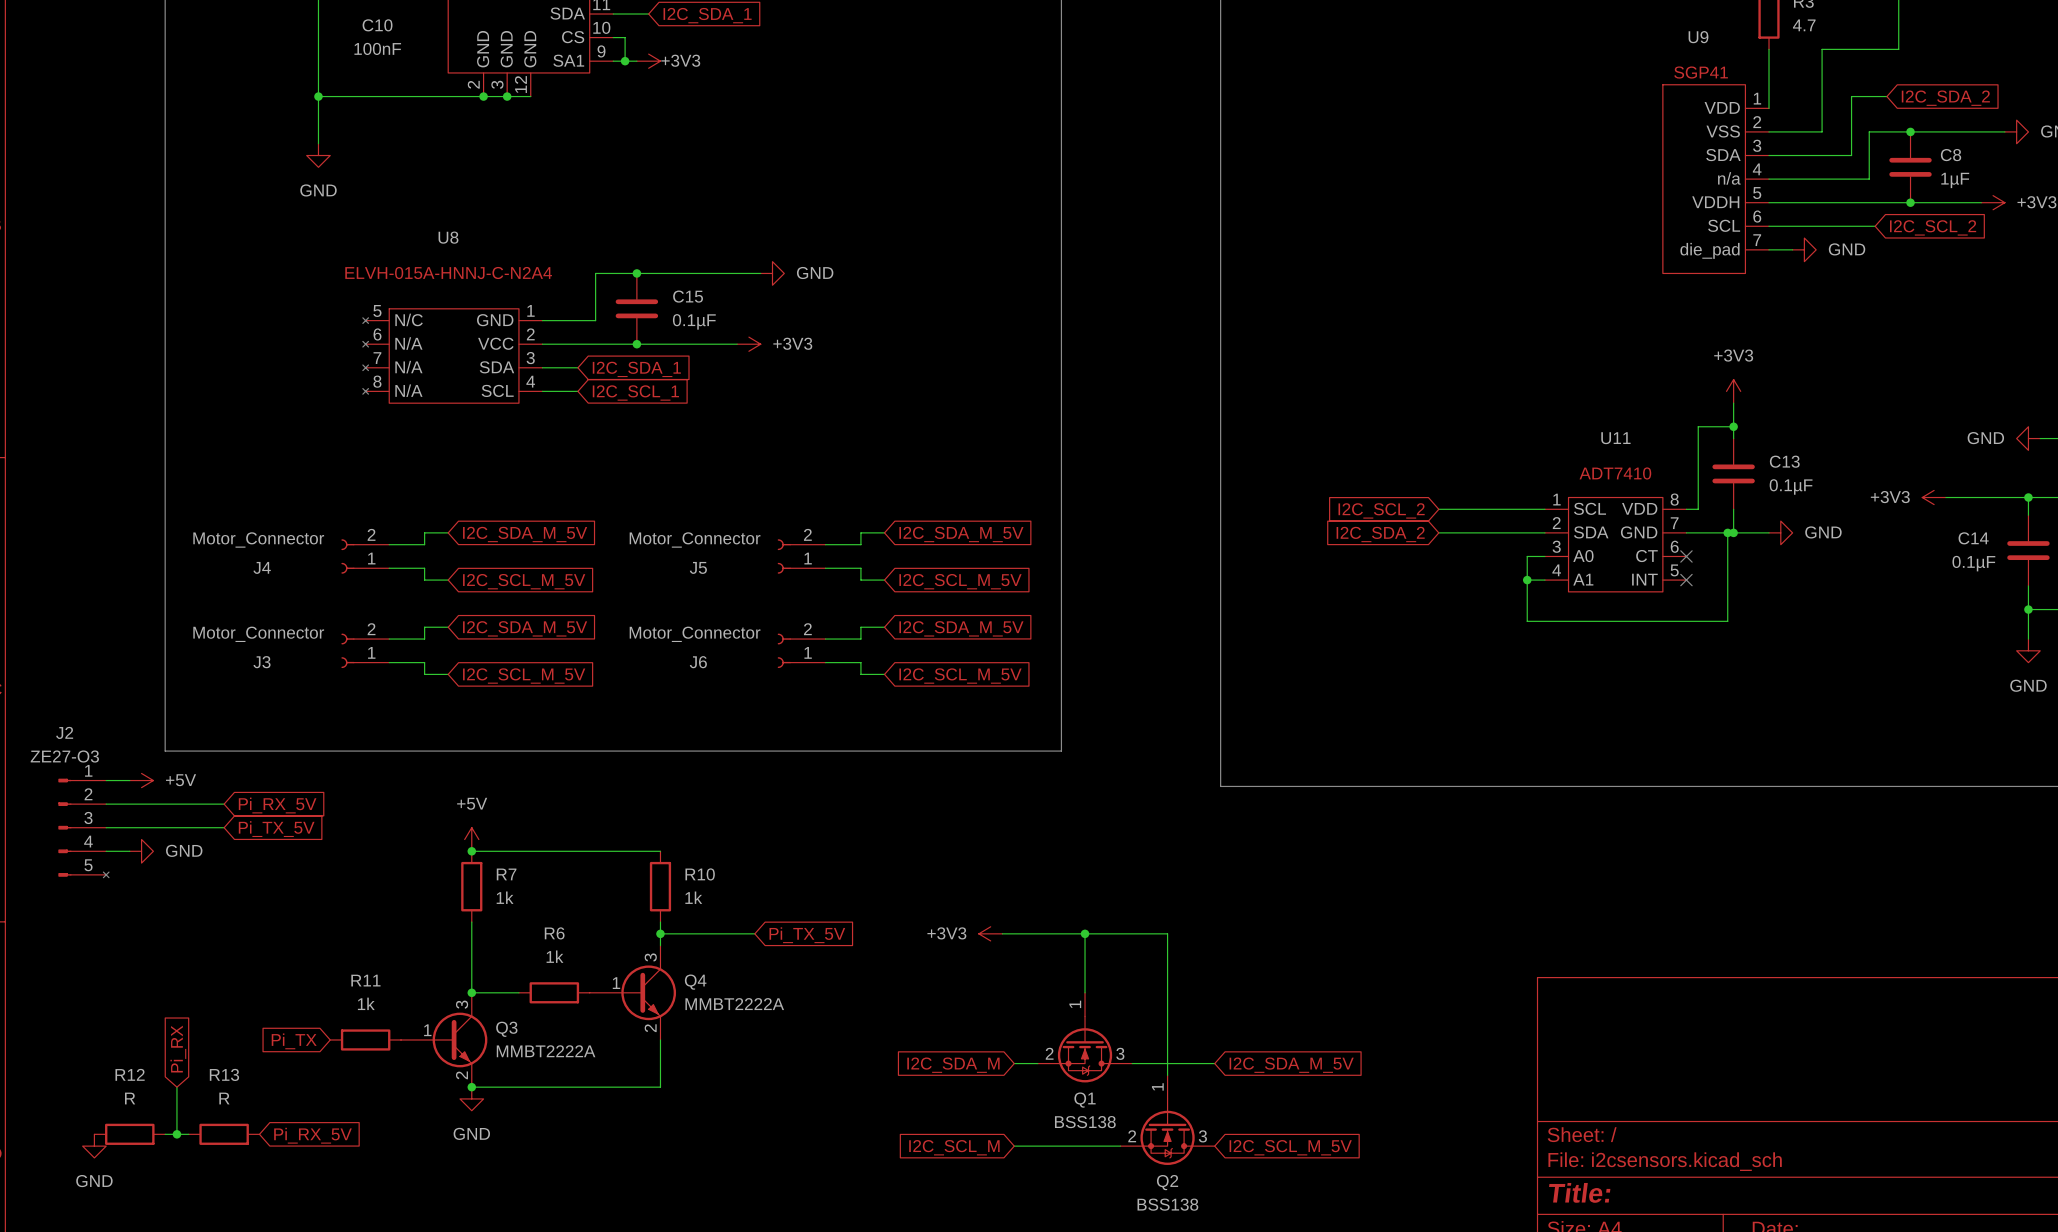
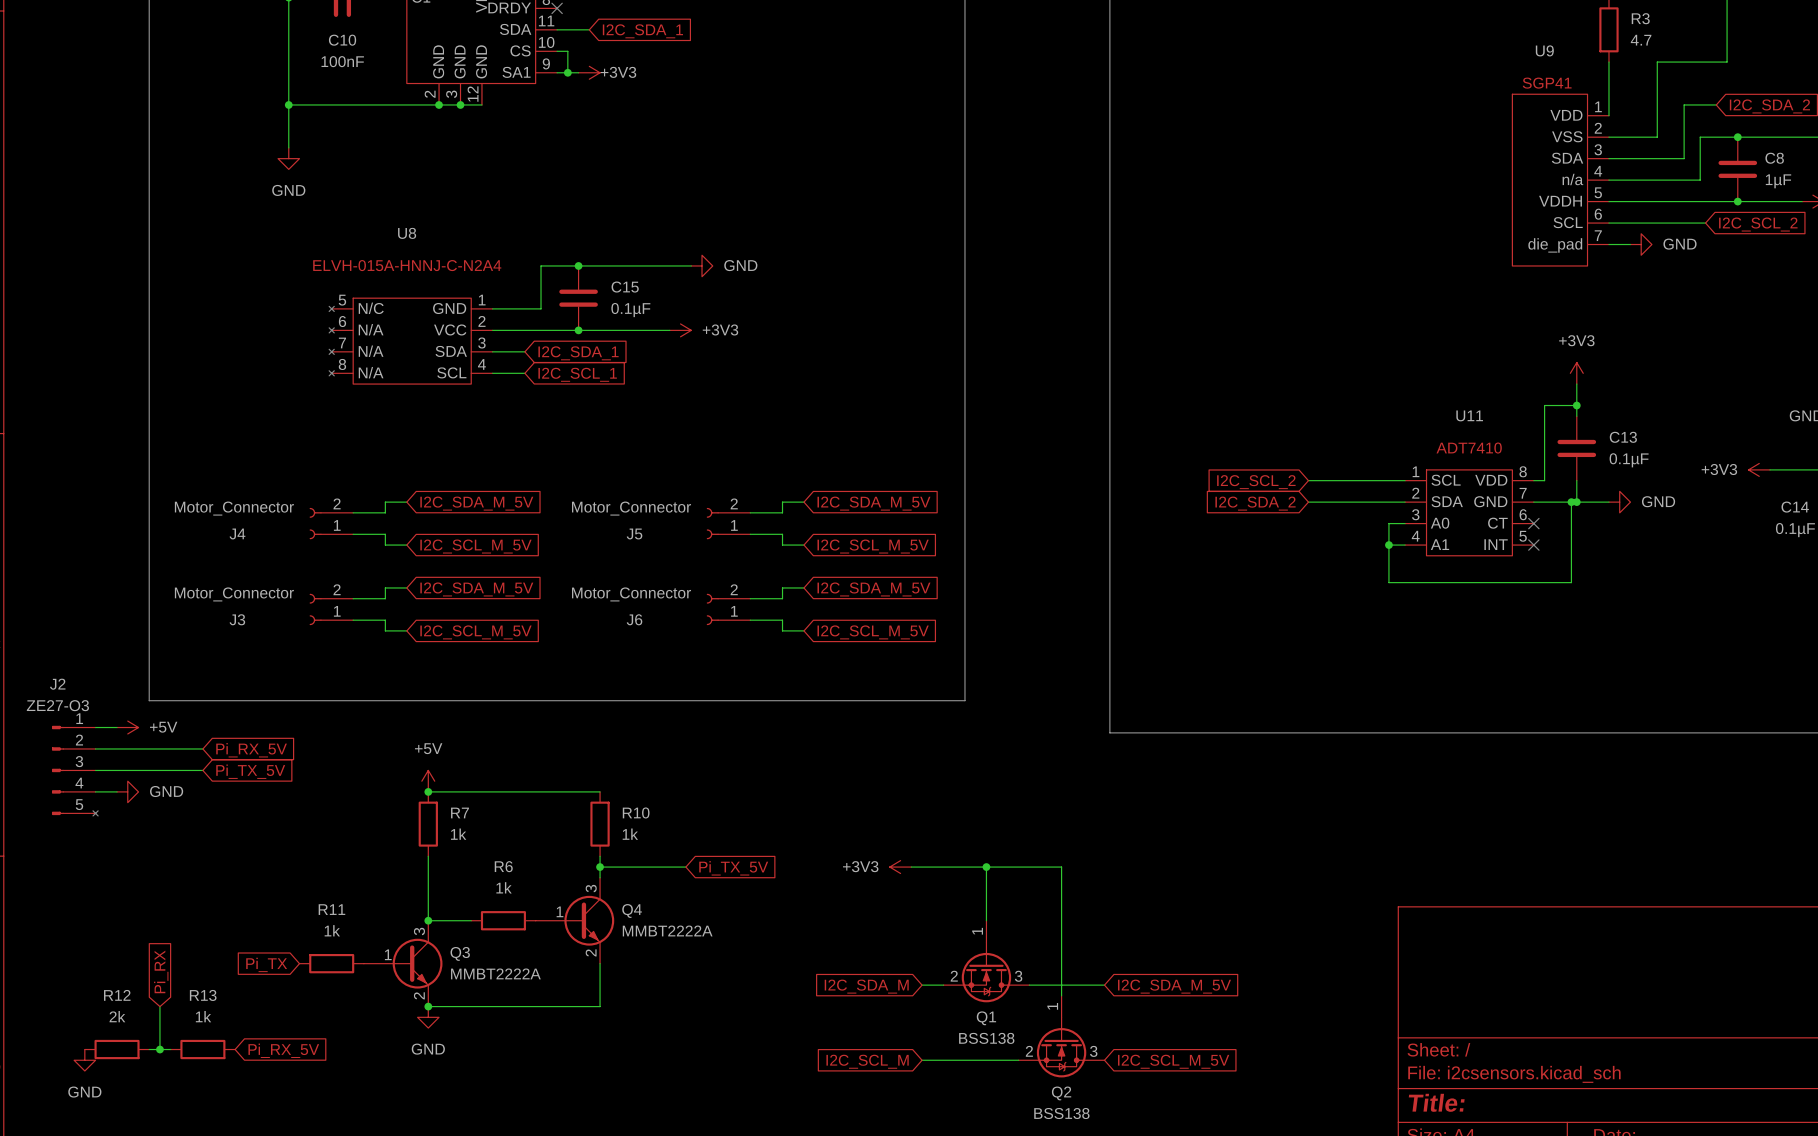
R12 value: R (130, 1098) -> 2k (117, 1016)
R13 value: R (224, 1098) -> 1k (203, 1016)

